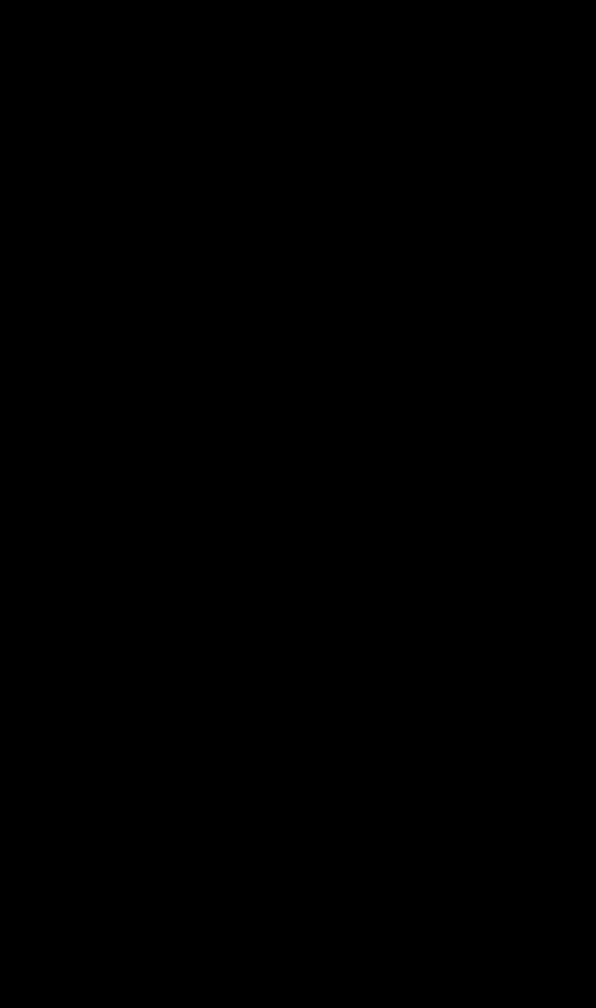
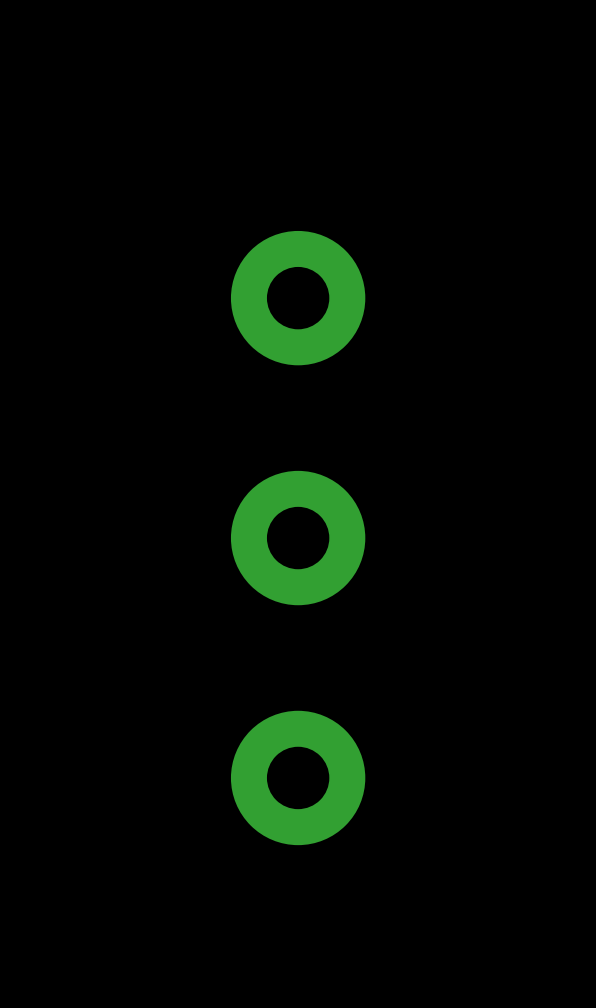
part: none -> (298, 538)

